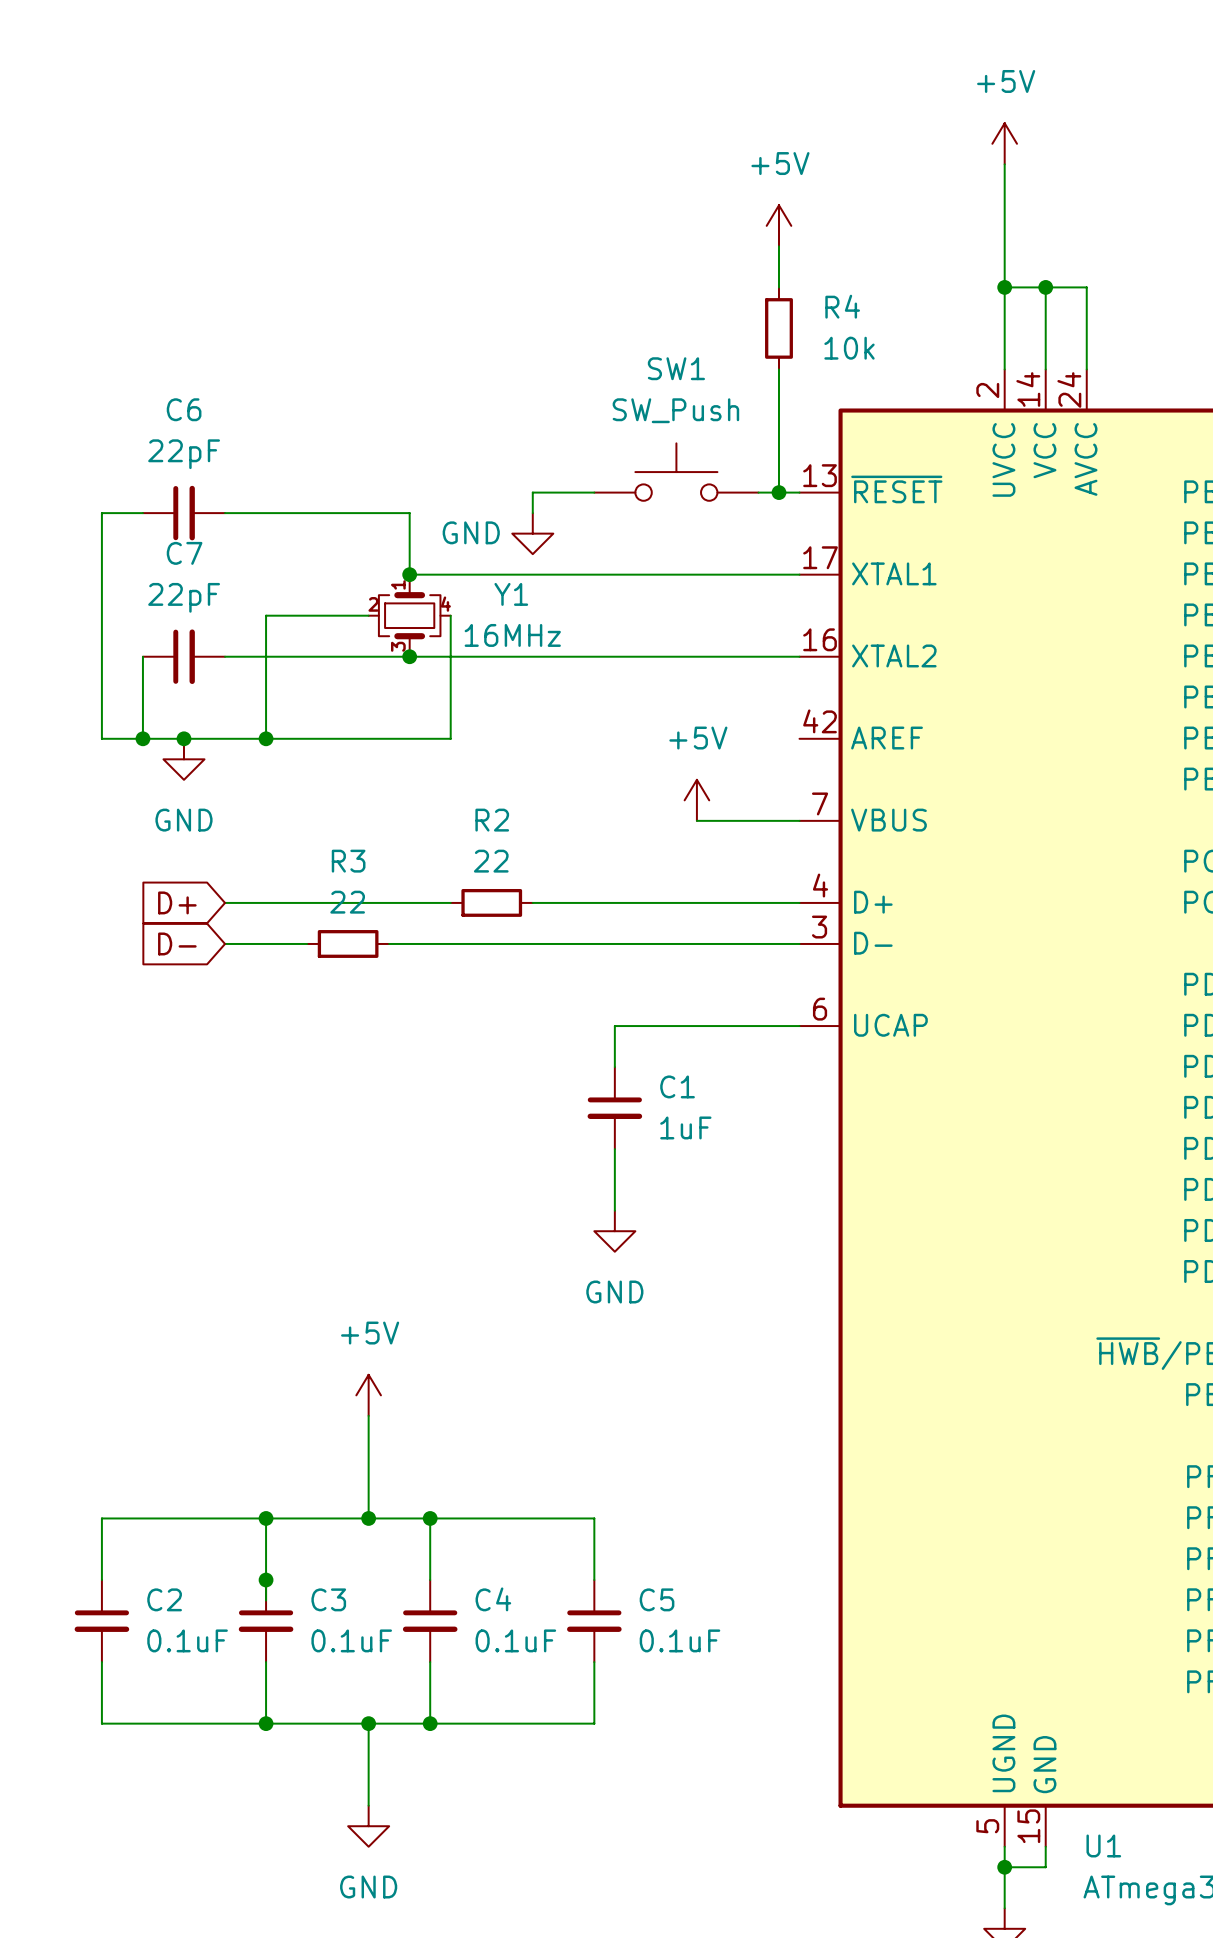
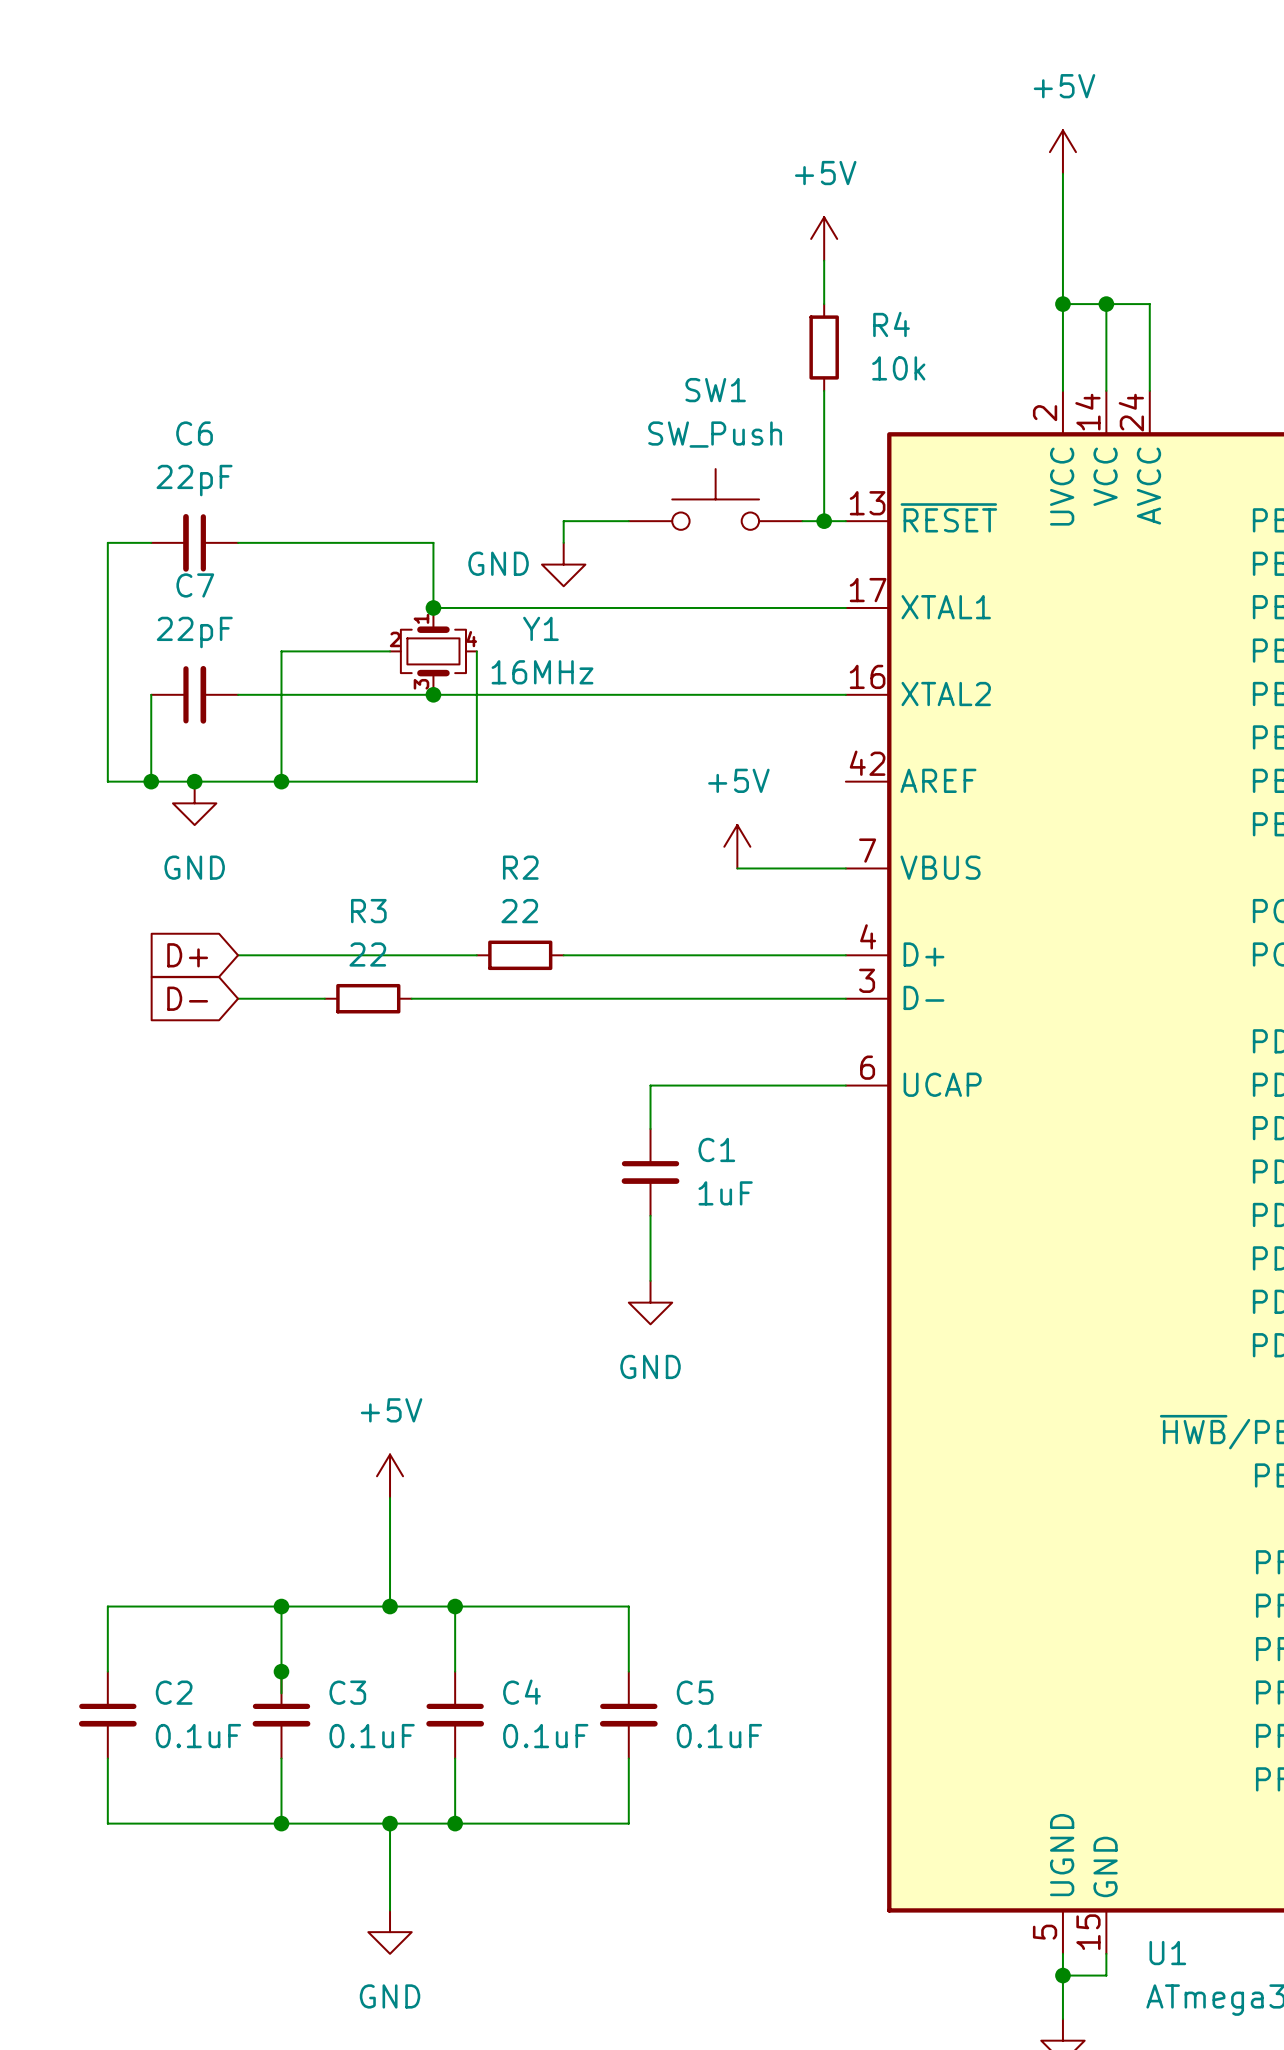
C6 rotation: 0° (184, 513) -> 180° (194, 542)

